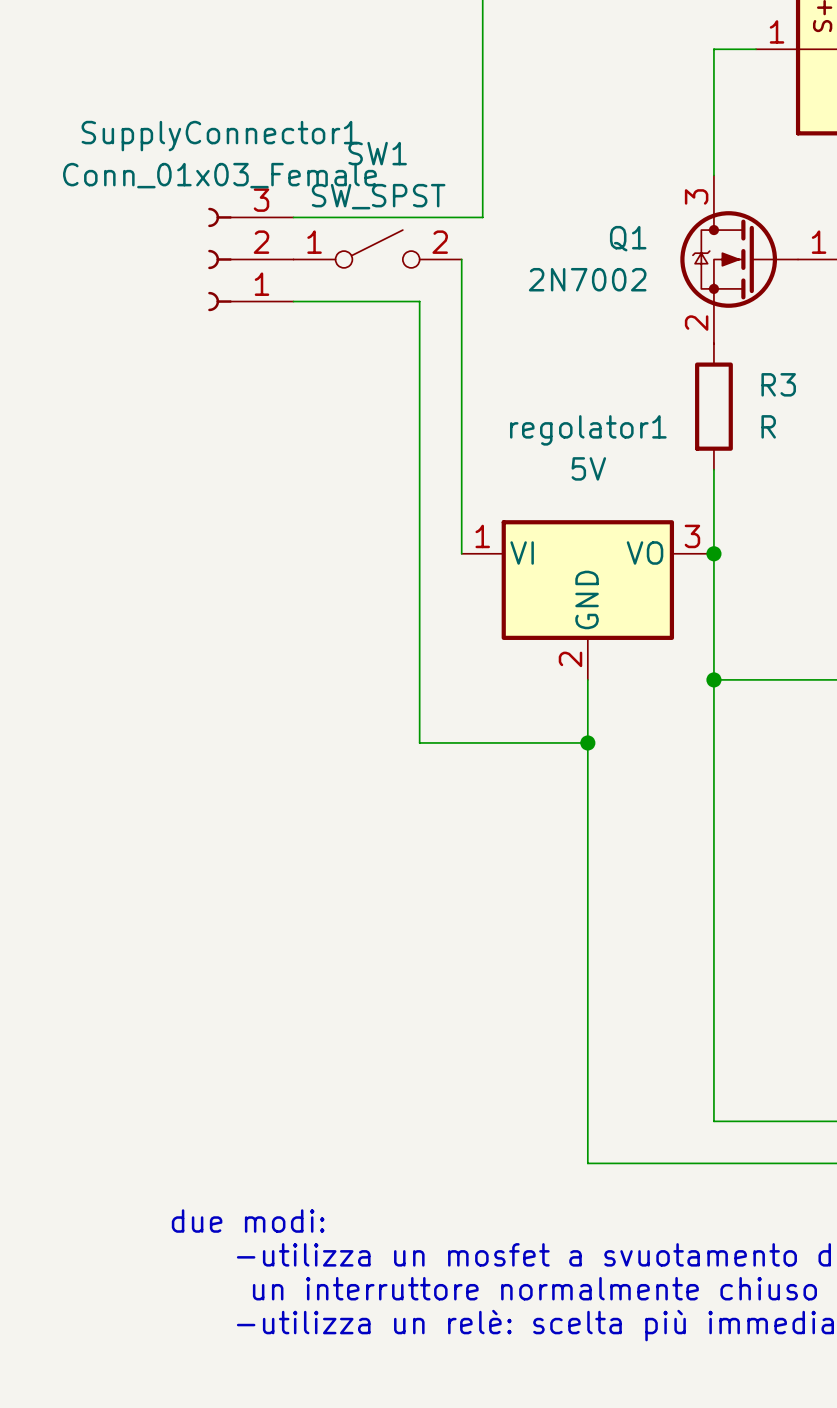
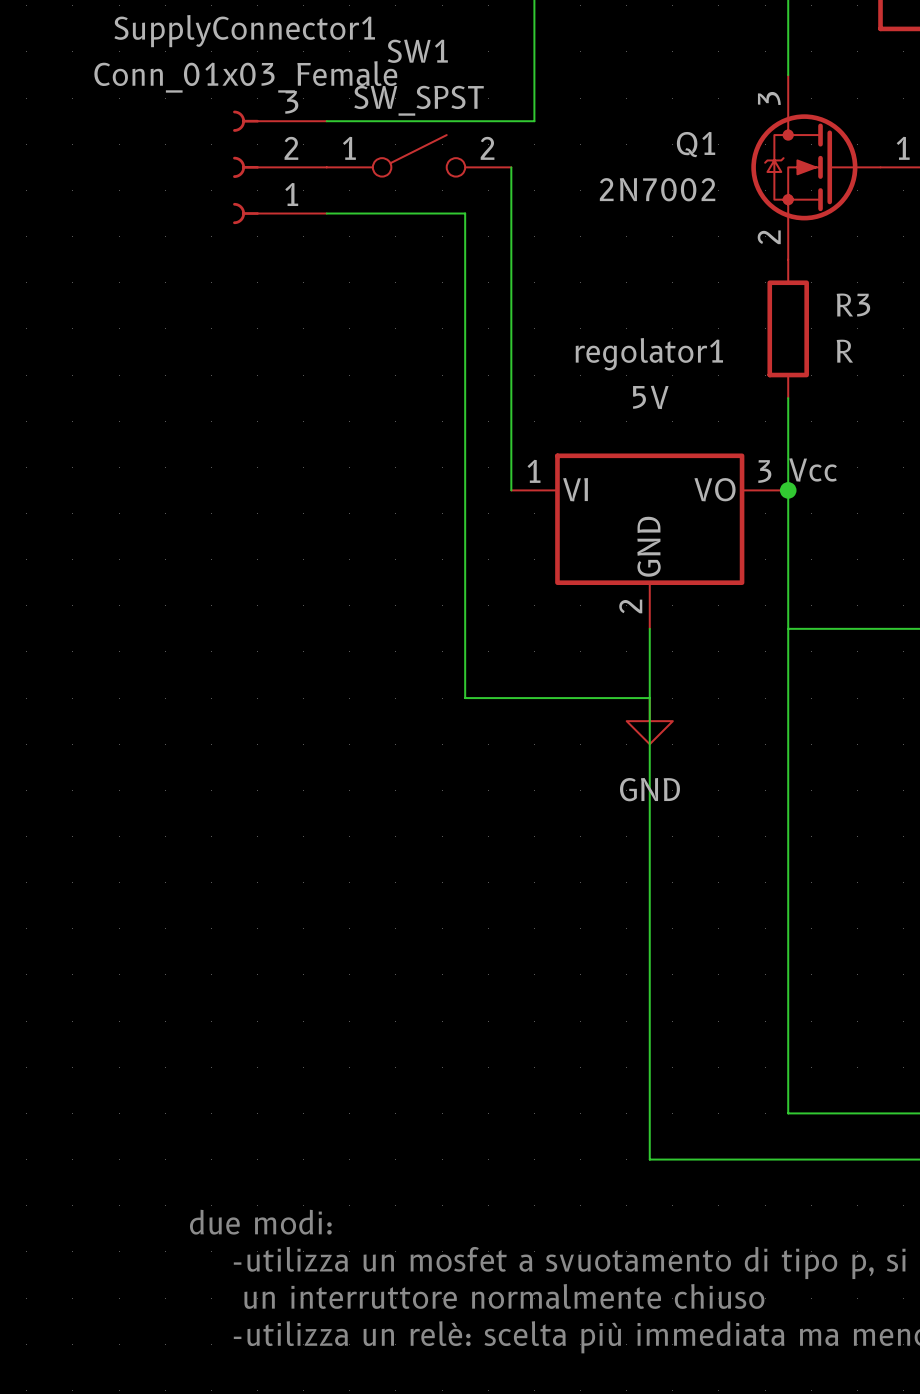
label: none -> Vcc (813, 469)
junction: (713, 679) -> none
junction: (587, 742) -> none
power symbol: none -> GND (649, 721)

